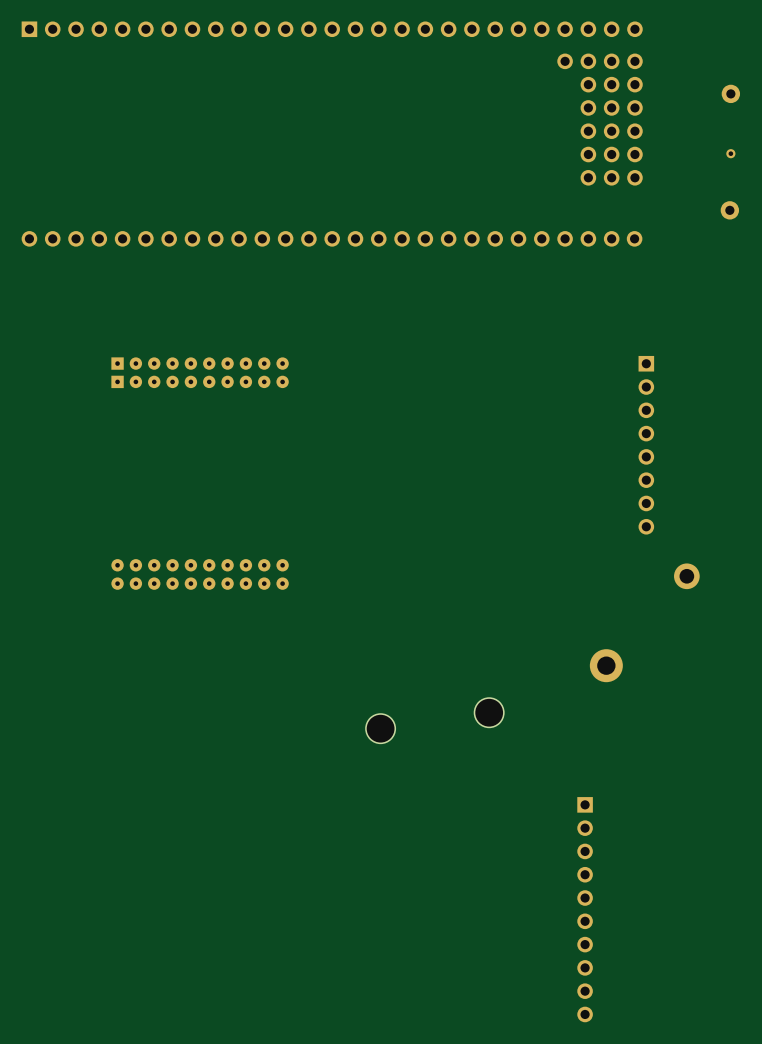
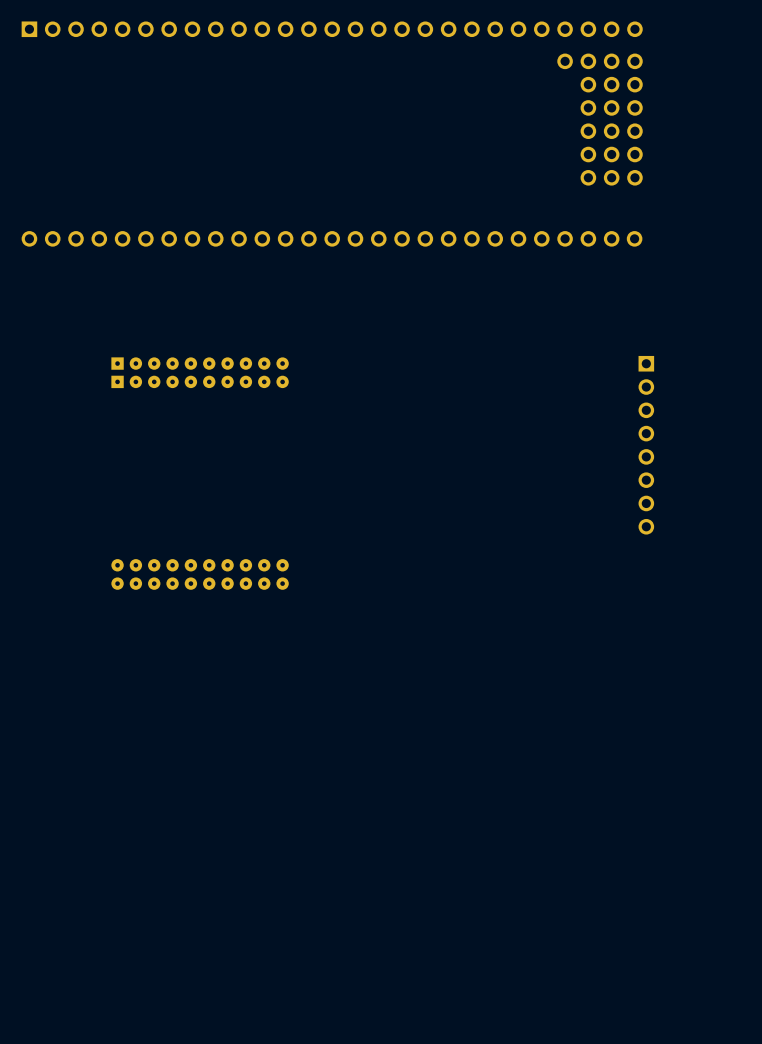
part: (730, 93) -> none
part: (730, 153) -> none
part: (729, 210) -> none
part: (686, 576) -> none
part: (606, 665) -> none
part: (489, 712) -> none
part: (380, 728) -> none
part: (585, 909) -> none

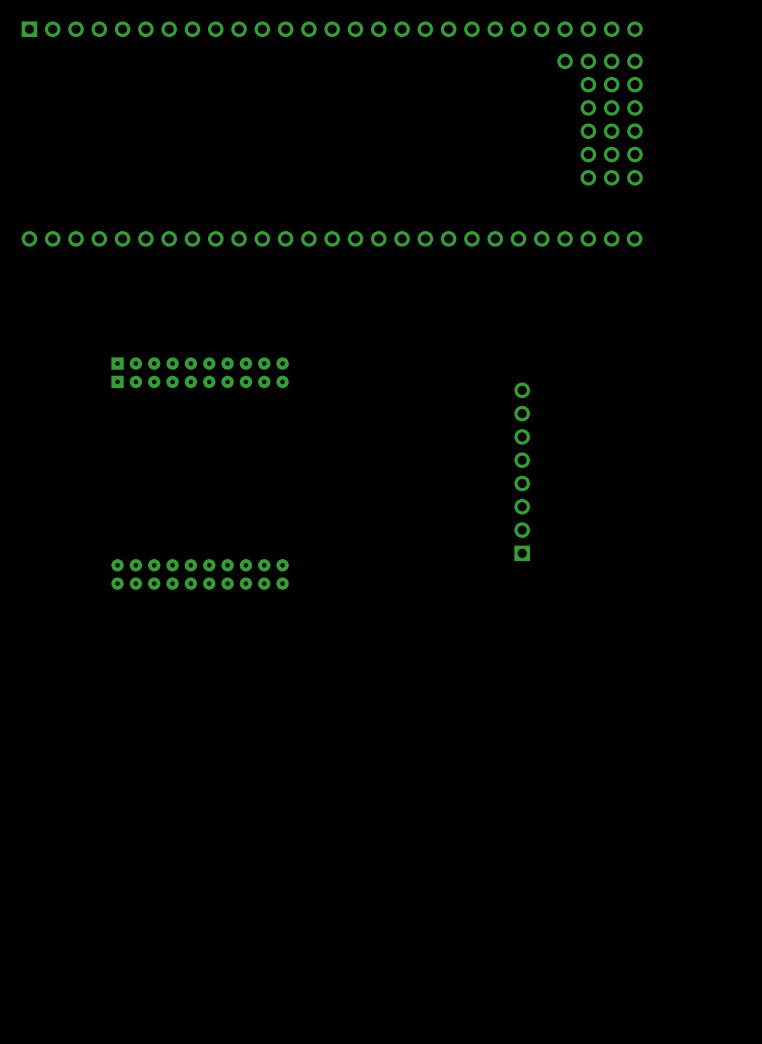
part rotation: 0° (646, 445) -> 180° (522, 471)
part position: (646, 445) -> (522, 471)

